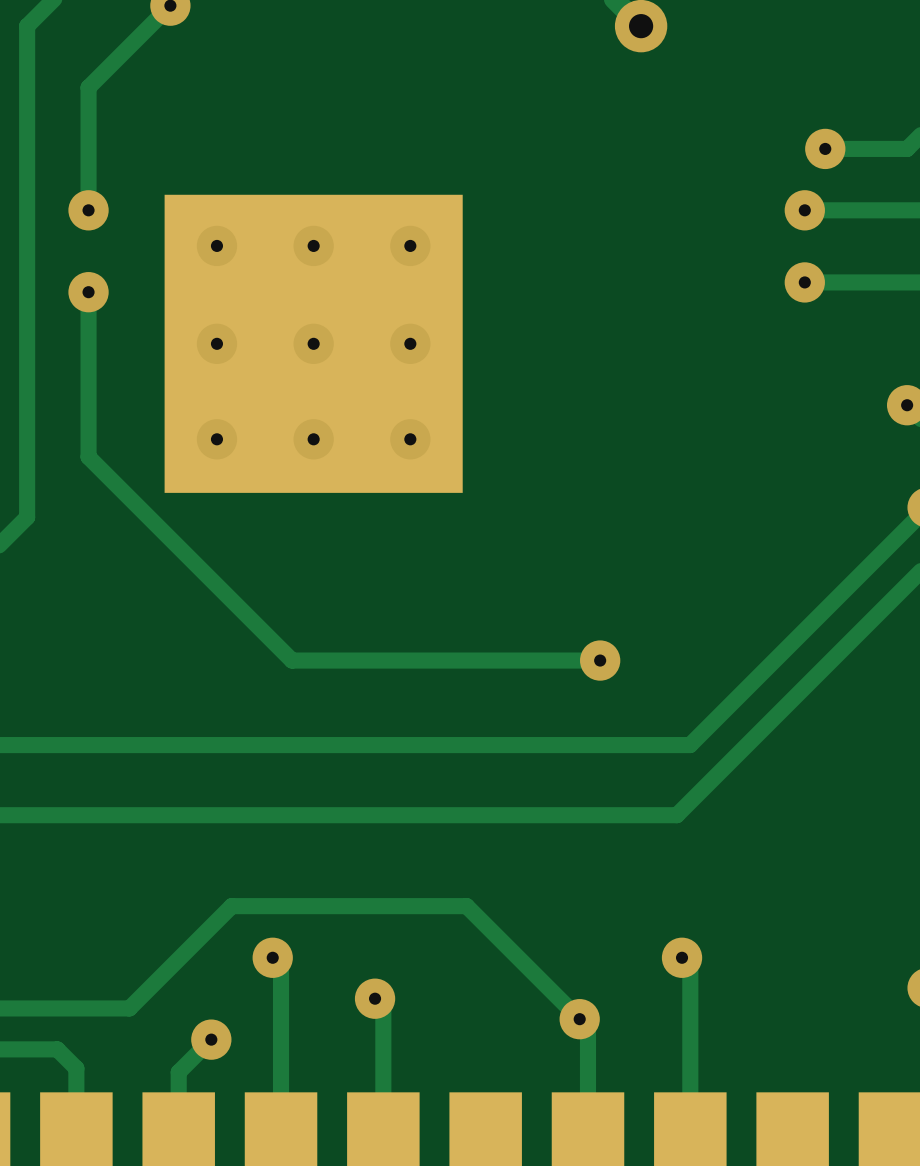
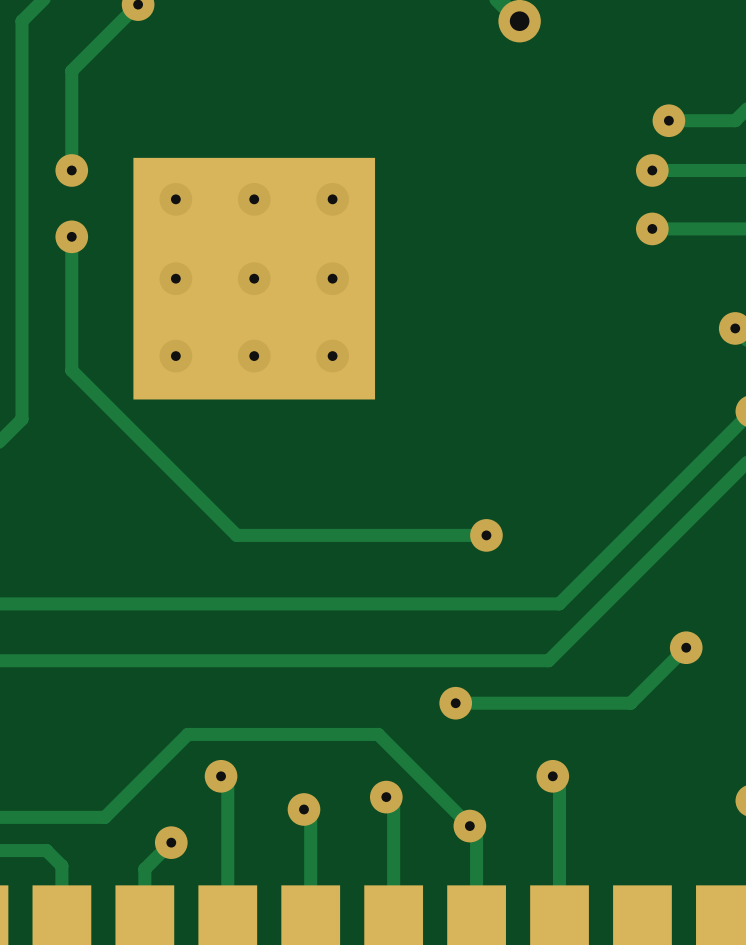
track: none -> (686, 647) (630, 703) (455, 703)
via: none -> (686, 647)
via: none -> (455, 703)
track: none -> (386, 797) (393, 804) (393, 934)
via: none -> (386, 797)

